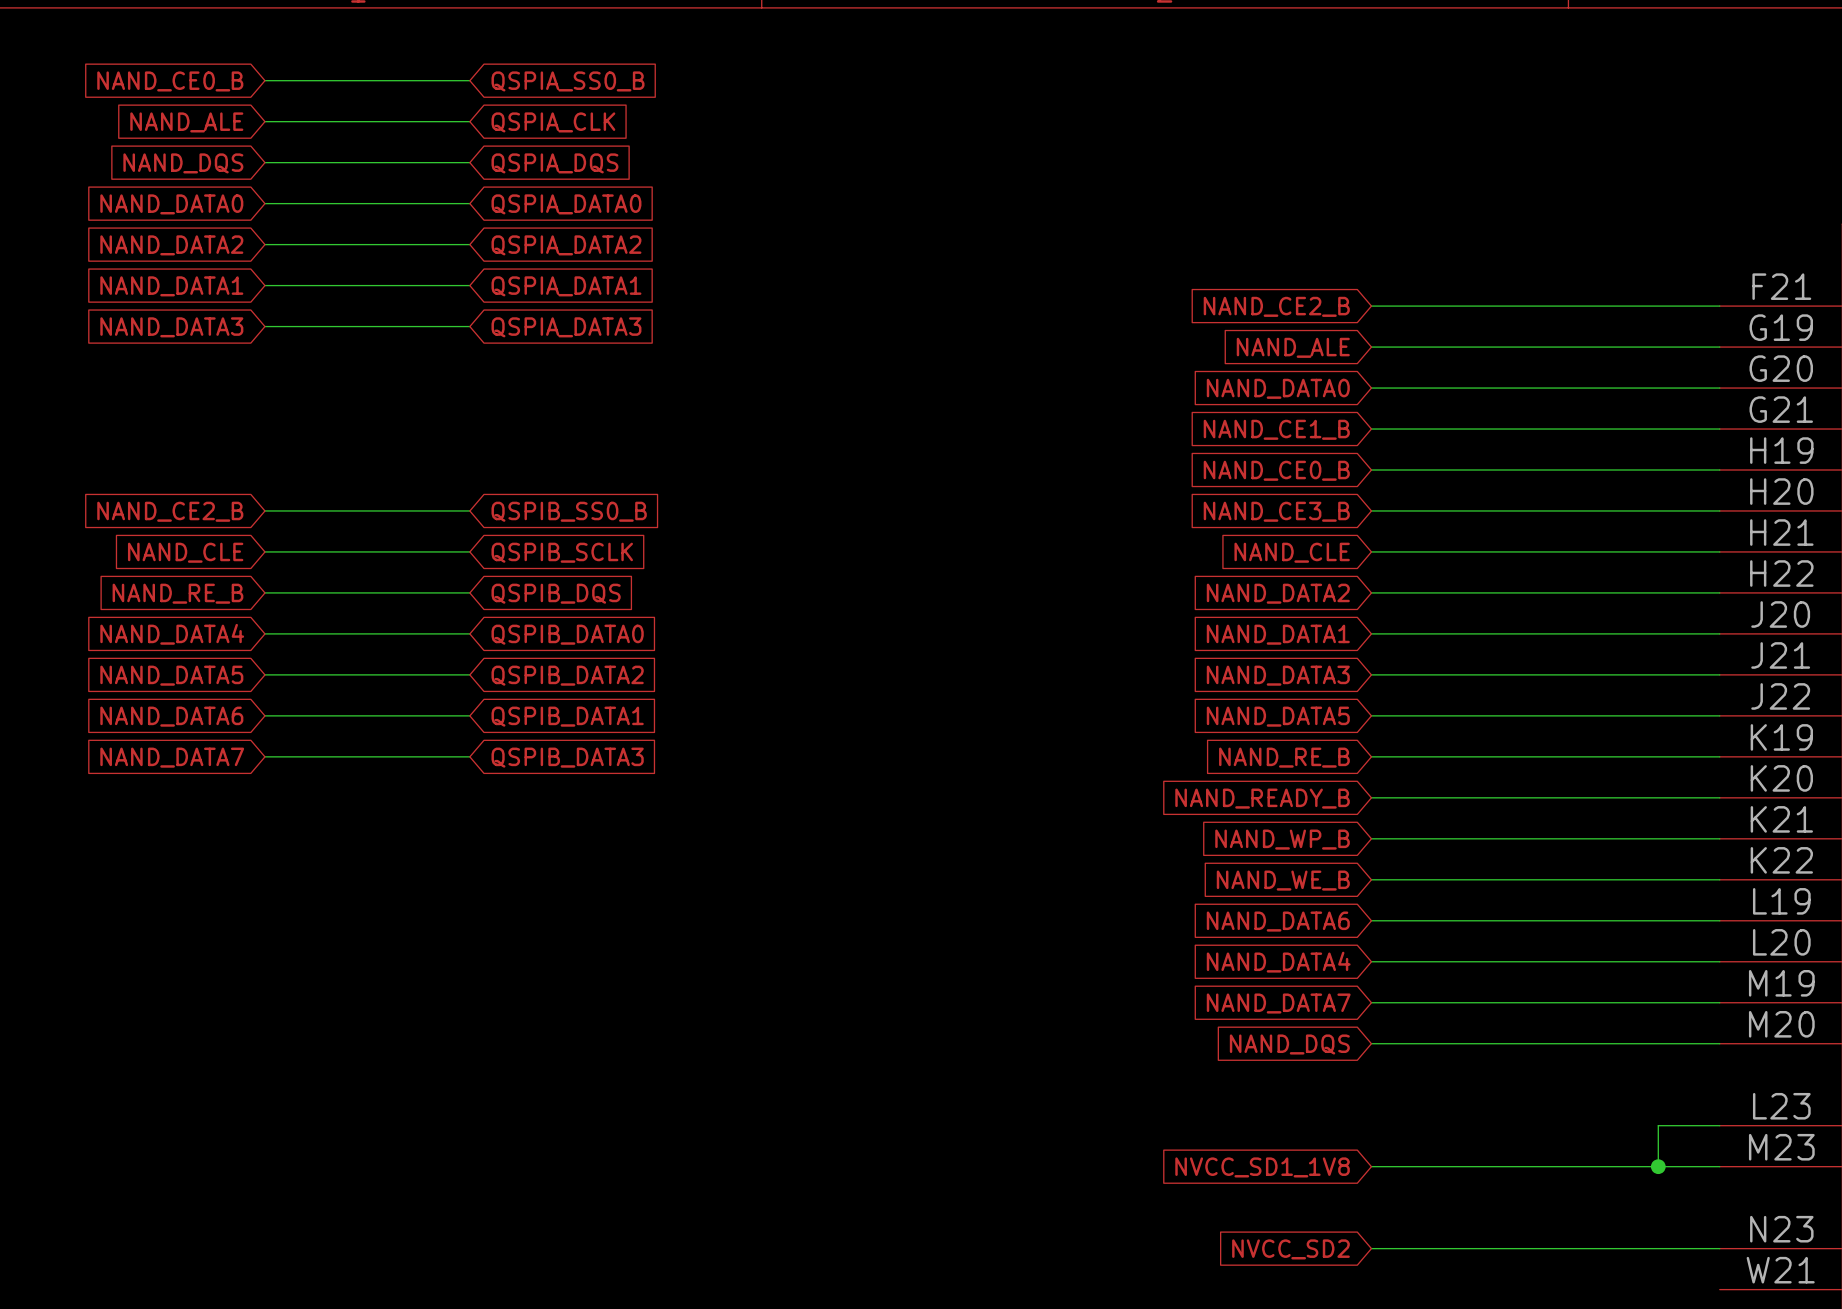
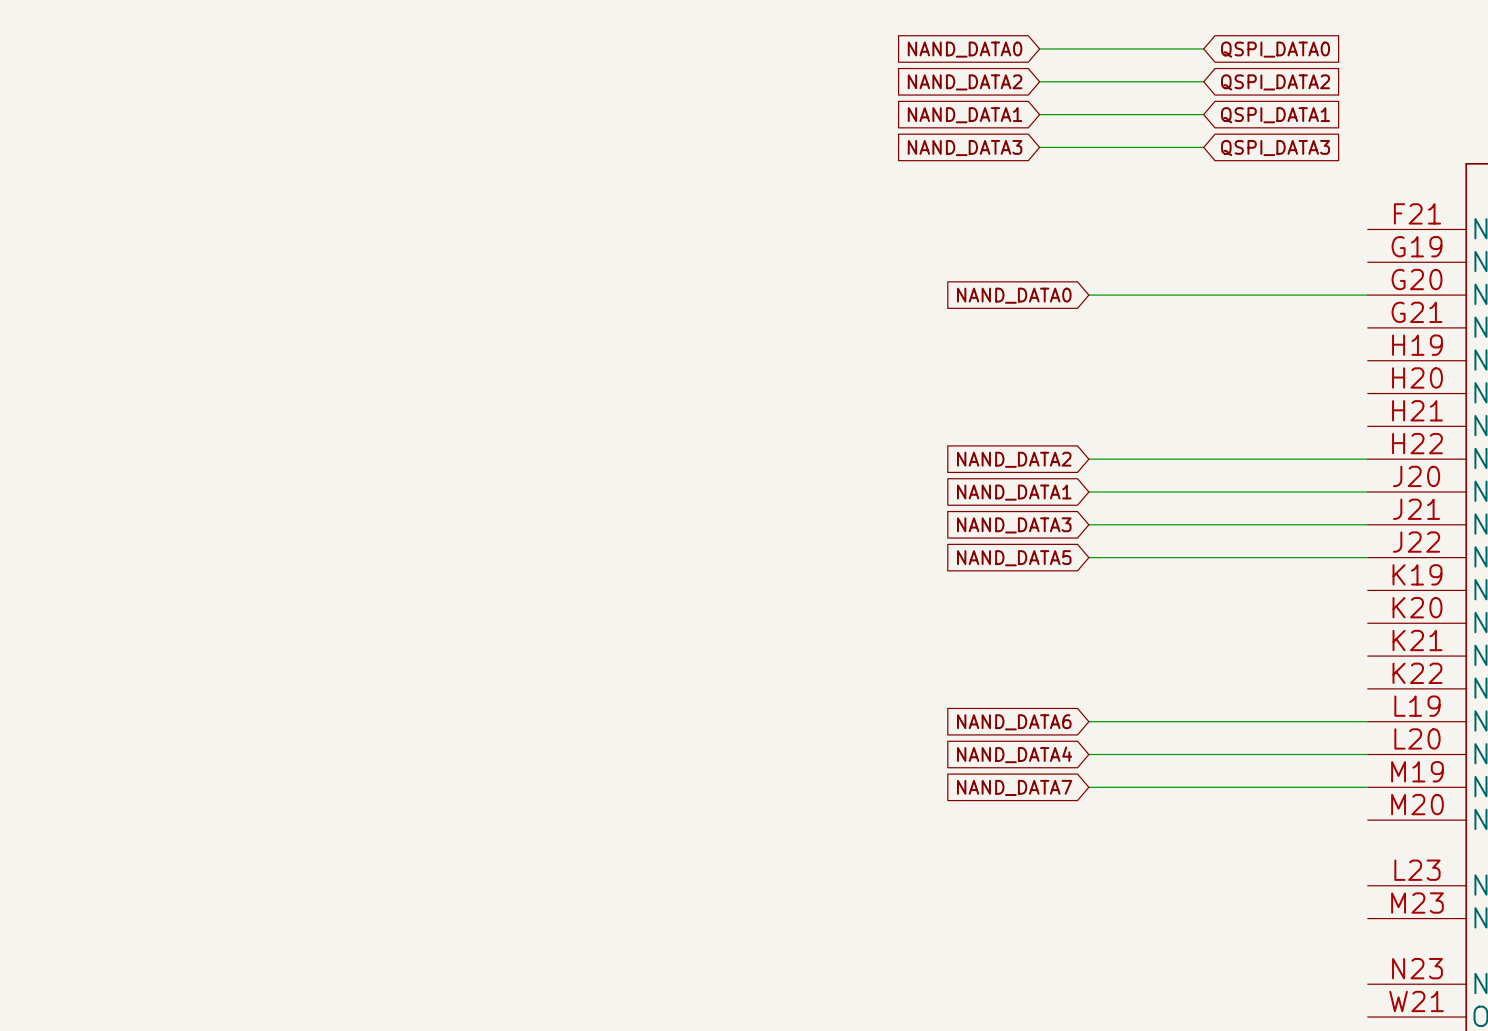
wire: (264, 80) (469, 80) -> none
wire: none -> (1039, 48) (1203, 48)
global label: NAND_CE0_B (170, 81) -> none
global label: QSPIA_SS0_B (568, 81) -> none
global label: none -> NAND_DATA0 (965, 49)
global label: none -> QSPI_DATA0 (1275, 49)
wire: (264, 121) (469, 121) -> none
wire: none -> (1039, 81) (1203, 81)
global label: NAND_ALE (186, 122) -> none
global label: QSPIA_CLK (553, 122) -> none
global label: none -> NAND_DATA2 (965, 82)
global label: none -> QSPI_DATA2 (1275, 82)
wire: (264, 162) (469, 162) -> none
wire: none -> (1039, 114) (1203, 114)
global label: NAND_DQS (183, 163) -> none
global label: QSPIA_DQS (554, 163) -> none
global label: none -> NAND_DATA1 (965, 115)
global label: none -> QSPI_DATA1 (1275, 115)
wire: (264, 203) (469, 203) -> none
wire: none -> (1039, 147) (1203, 147)
global label: NAND_DATA0 (171, 204) -> none
global label: QSPIA_DATA0 (566, 204) -> none
global label: none -> NAND_DATA3 (965, 148)
global label: none -> QSPI_DATA3 (1275, 148)
wire: (264, 244) (469, 244) -> none
global label: NAND_DATA2 (171, 245) -> none
global label: QSPIA_DATA2 (566, 245) -> none
wire: (264, 285) (469, 285) -> none
global label: NAND_DATA1 (171, 286) -> none
global label: QSPIA_DATA1 (566, 286) -> none
global label: NAND_CE2_B (1276, 306) -> none
wire: (1371, 306) (1719, 306) -> none
wire: (264, 326) (469, 326) -> none
global label: NAND_DATA3 (171, 327) -> none
global label: QSPIA_DATA3 (566, 327) -> none
global label: NAND_ALE (1293, 347) -> none
wire: (1371, 347) (1719, 347) -> none
global label: NAND_CE1_B (1276, 429) -> none
wire: (1371, 429) (1719, 429) -> none
global label: NAND_CE0_B (1276, 470) -> none
wire: (1371, 470) (1719, 470) -> none
wire: (264, 510) (469, 510) -> none
wire: (1371, 510) (1719, 510) -> none
global label: NAND_CE2_B (170, 511) -> none
global label: QSPIB_SS0_B (569, 511) -> none
global label: NAND_CE3_B (1276, 511) -> none
wire: (264, 551) (469, 551) -> none
wire: (1371, 551) (1719, 551) -> none
global label: NAND_CLE (185, 552) -> none
global label: QSPIB_SCLK (562, 552) -> none
global label: NAND_CLE (1292, 552) -> none
wire: (264, 592) (469, 592) -> none
global label: NAND_RE_B (177, 593) -> none
global label: QSPIB_DQS (556, 593) -> none
wire: (264, 633) (469, 633) -> none
global label: NAND_DATA4 (172, 634) -> none
global label: QSPIB_DATA0 (567, 634) -> none
wire: (264, 674) (469, 674) -> none
global label: NAND_DATA5 (171, 675) -> none
global label: QSPIB_DATA2 (567, 675) -> none
wire: (264, 715) (469, 715) -> none
global label: NAND_DATA6 (171, 716) -> none
global label: QSPIB_DATA1 (567, 716) -> none
wire: (264, 756) (469, 756) -> none
wire: (1371, 756) (1719, 756) -> none
global label: NAND_DATA7 (172, 757) -> none
global label: QSPIB_DATA3 (567, 757) -> none
global label: NAND_RE_B (1284, 757) -> none
wire: (1371, 797) (1719, 797) -> none
global label: NAND_READY_B (1262, 798) -> none
wire: (1371, 838) (1719, 838) -> none
global label: NAND_WP_B (1282, 839) -> none
wire: (1371, 879) (1719, 879) -> none
global label: NAND_WE_B (1283, 880) -> none
wire: (1371, 1043) (1719, 1043) -> none
global label: NAND_DQS (1289, 1044) -> none
wire: (1719, 1125) (1658, 1125) (1658, 1166) -> none
wire: (1371, 1166) (1719, 1166) -> none
junction: (1658, 1166) -> none
global label: NVCC_SD1_1V8 (1262, 1167) -> none
wire: (1371, 1248) (1719, 1248) -> none
global label: NVCC_SD2 (1290, 1249) -> none

